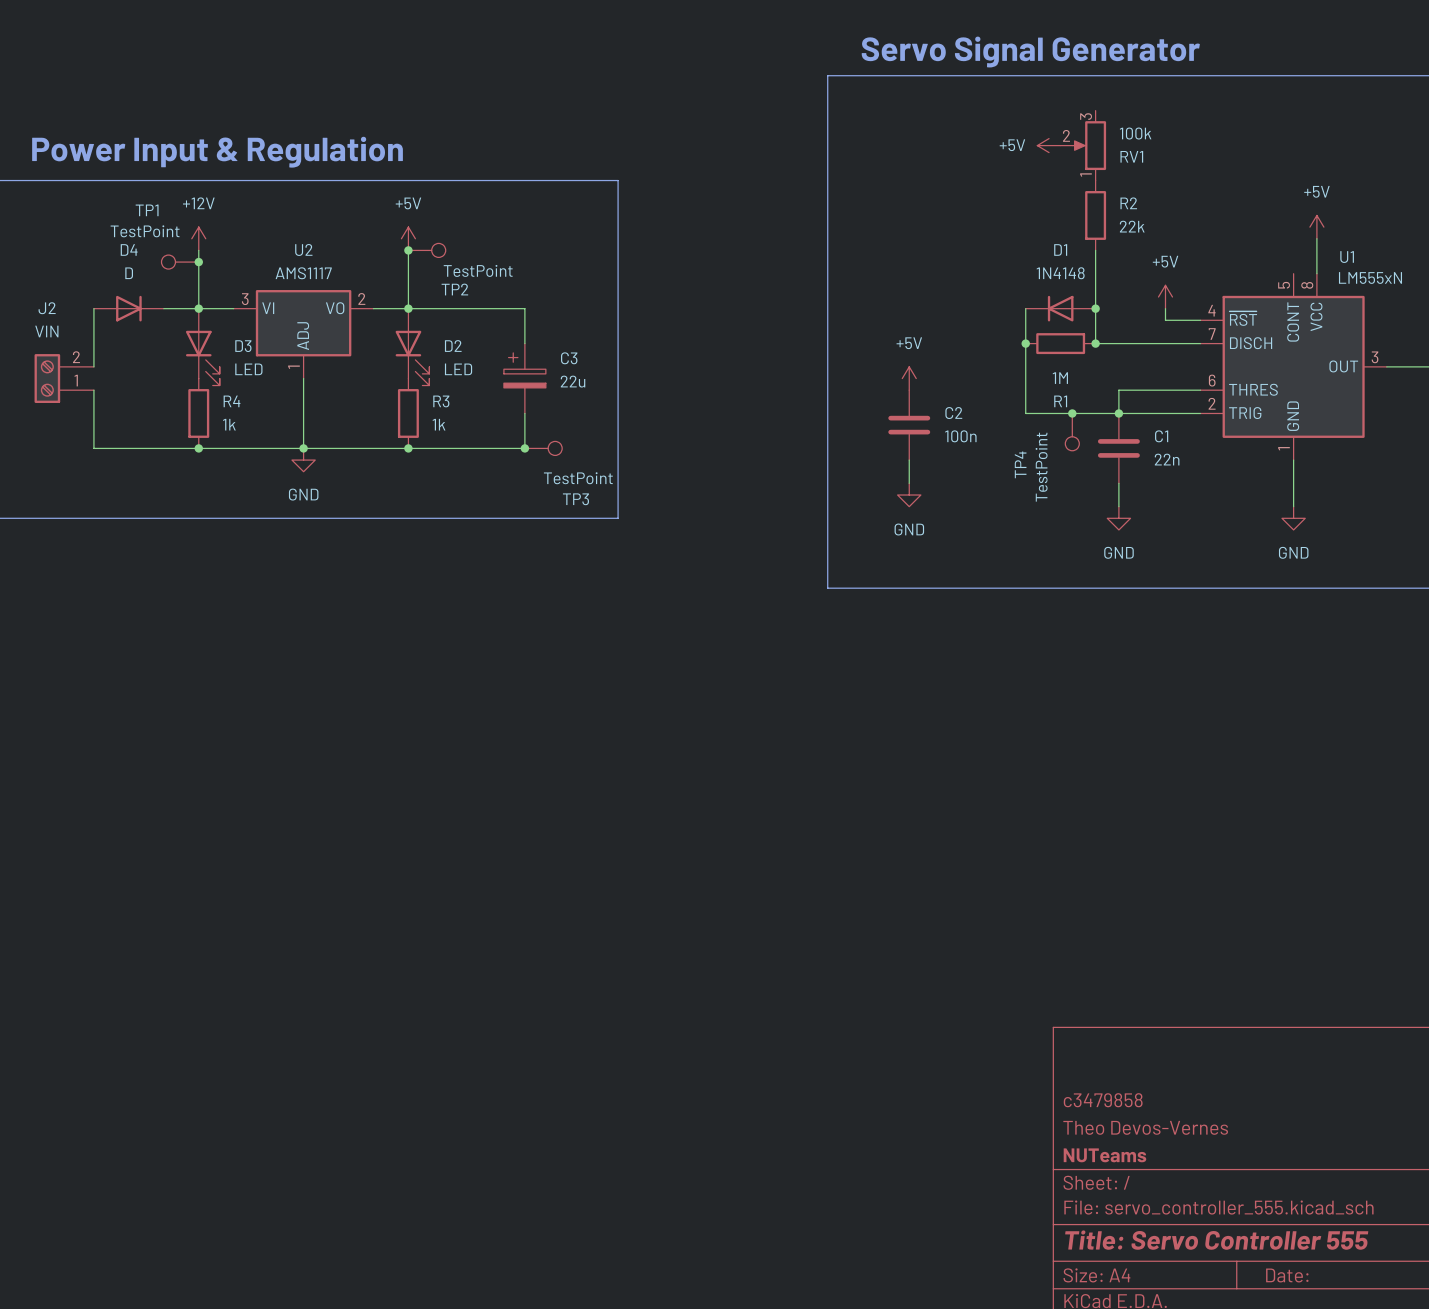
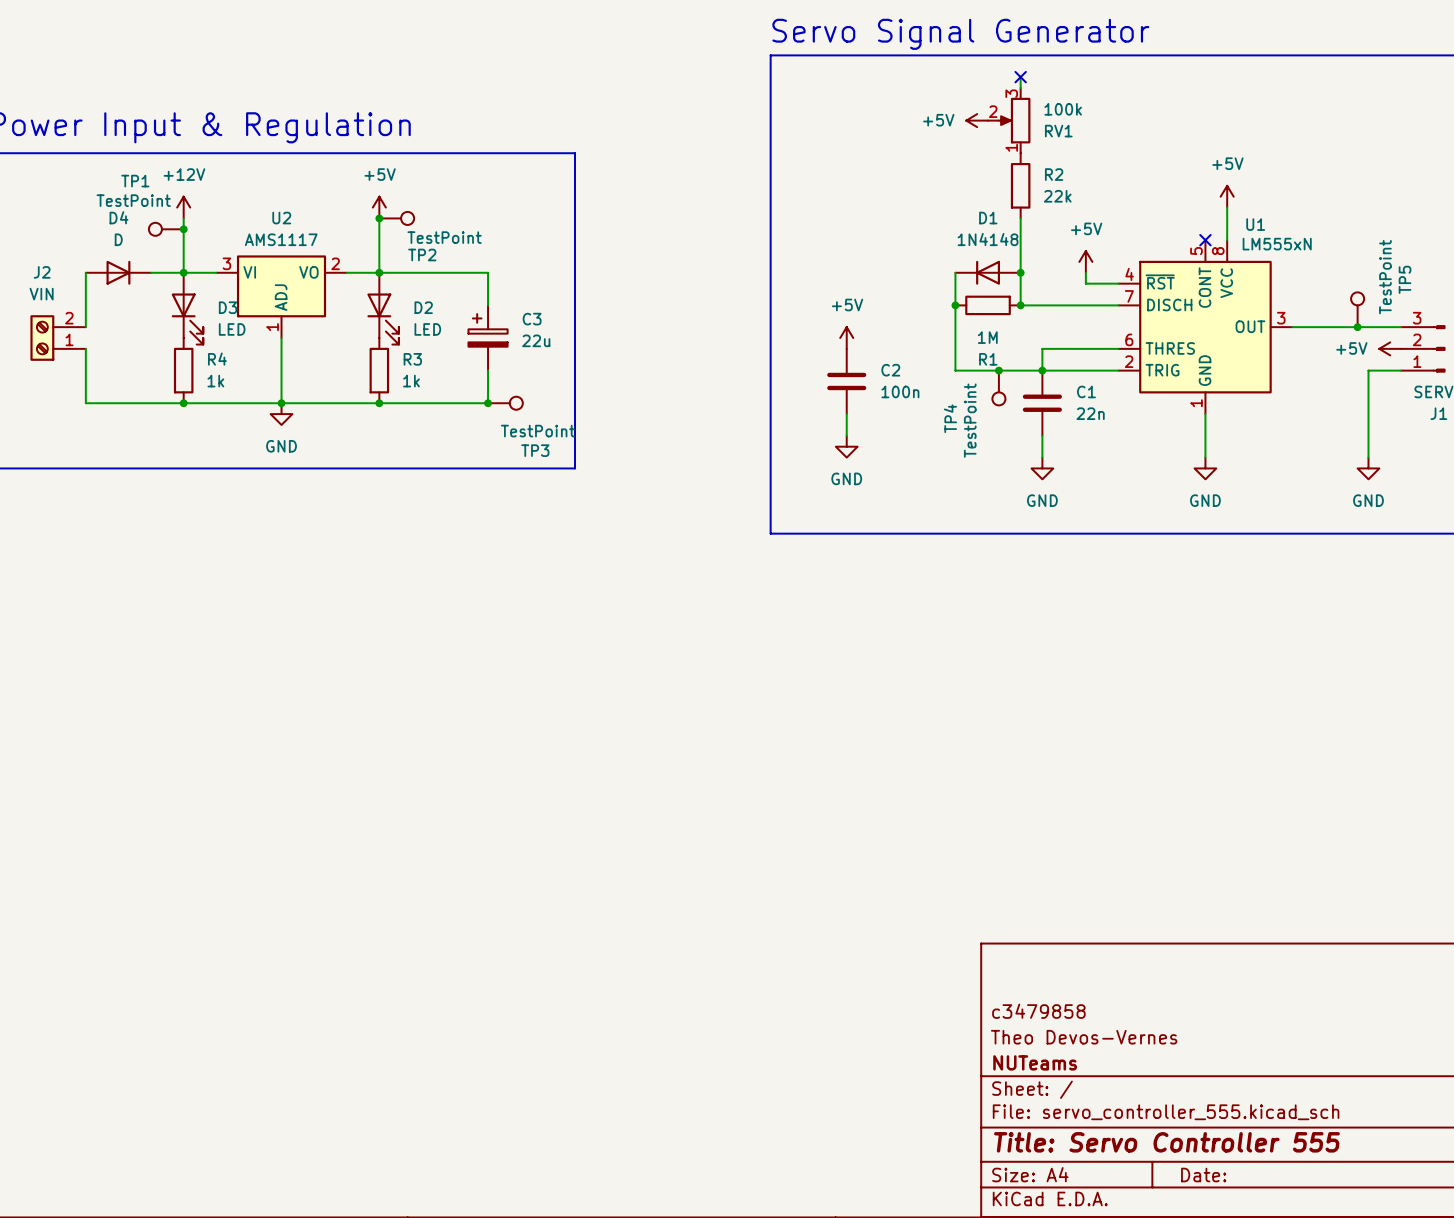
wire: none -> (1020, 77) (1020, 88)
no-connect mark: none -> (1020, 77)
no-connect mark: none -> (1205, 240)

